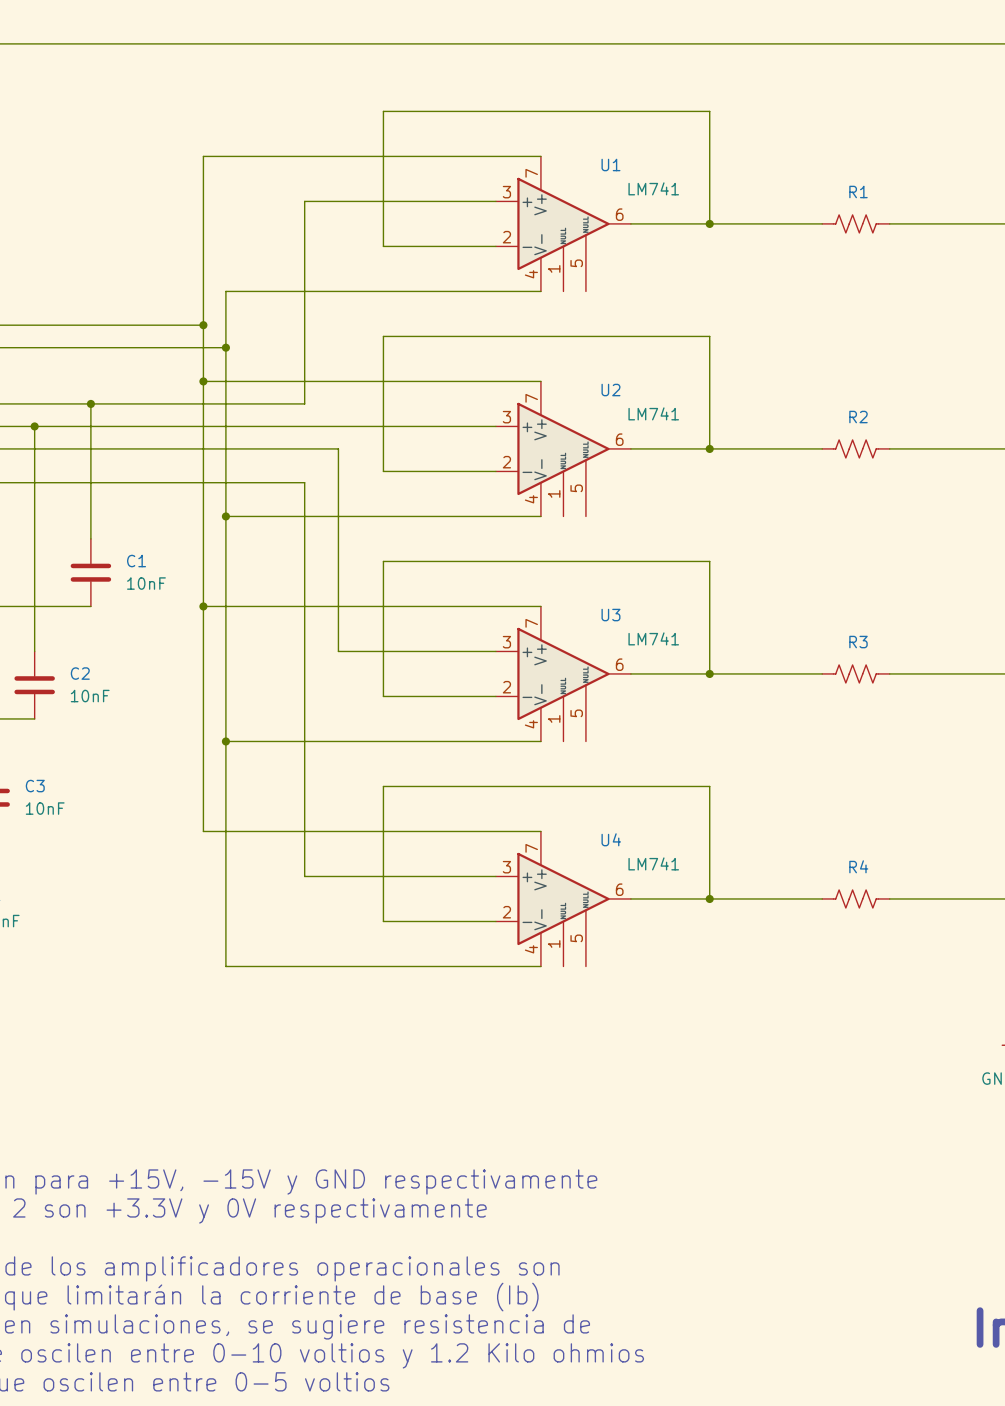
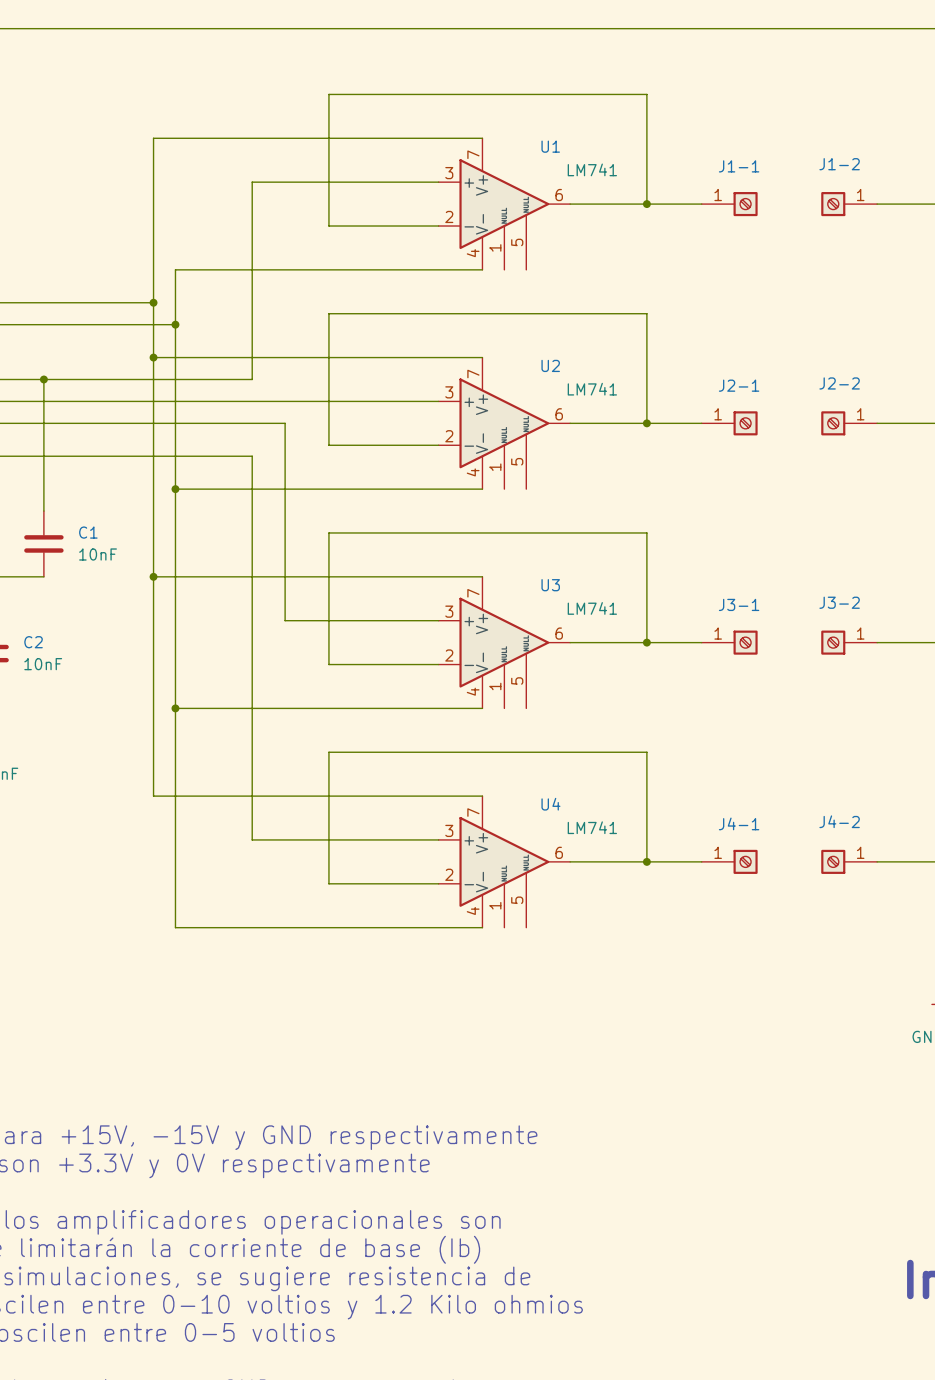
J1-1: none -> (729, 204)
R1: (855, 223) -> none
J1-2: none -> (849, 204)
J2-1: none -> (729, 423)
R2: (855, 448) -> none
J2-2: none -> (849, 423)
J3-1: none -> (729, 642)
R3: (855, 673) -> none
J3-2: none -> (849, 642)
J4-1: none -> (729, 861)
R4: (855, 898) -> none
J4-2: none -> (849, 861)

